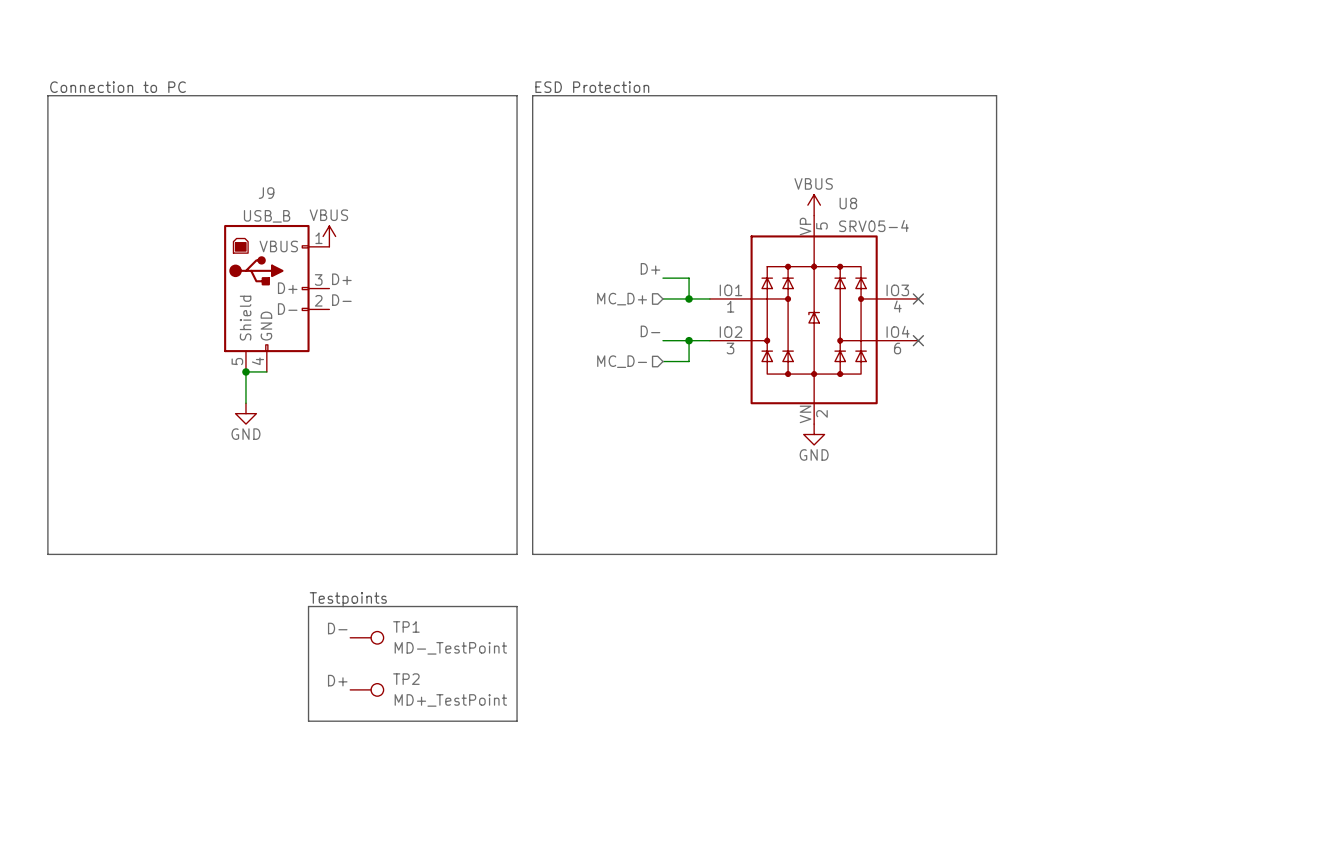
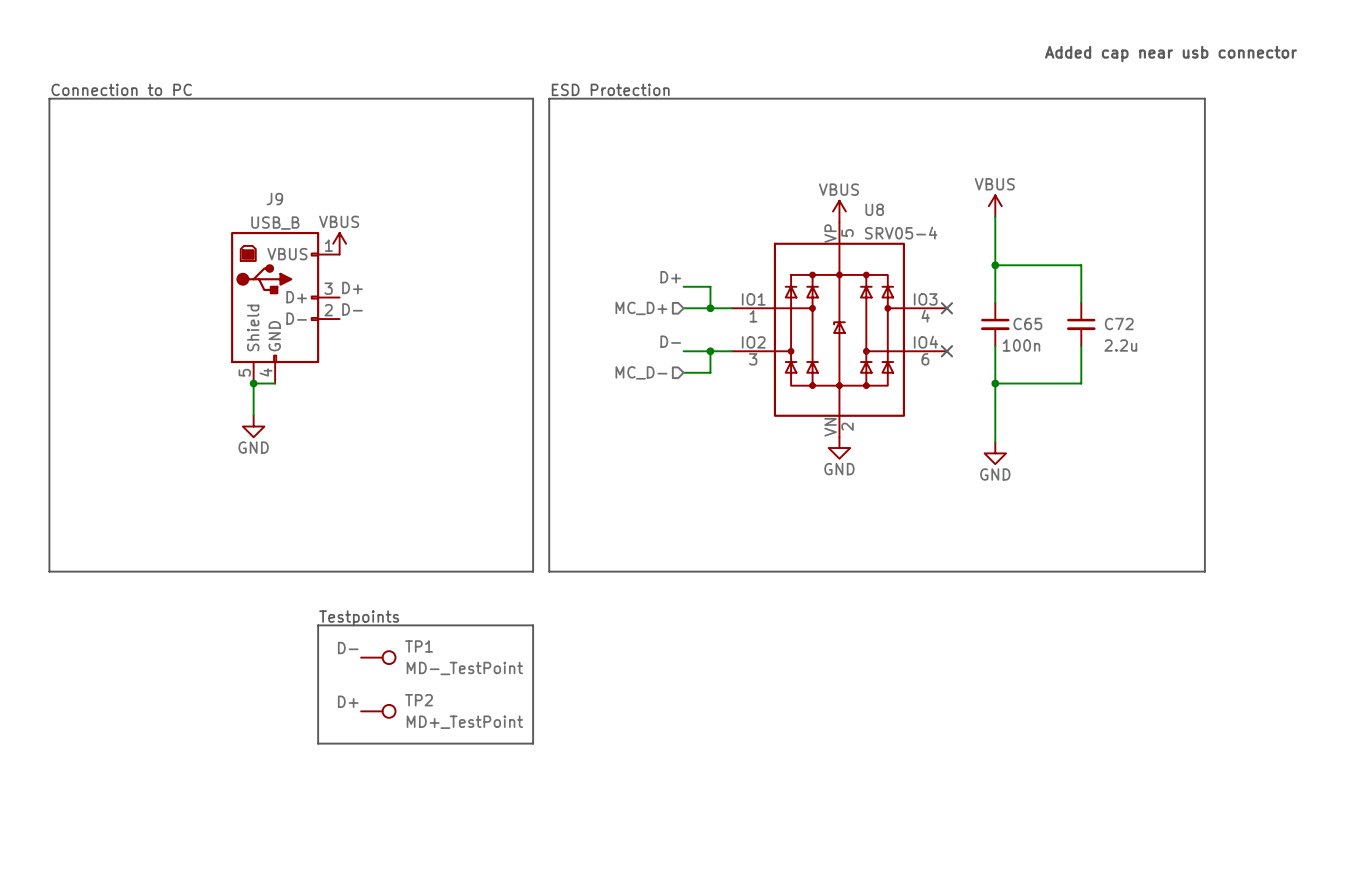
text: none -> Added cap near usb connector (1171, 54)
line: (996, 95) (996, 554) -> (1027, 98) (1204, 98) (1204, 571) (1027, 571)
power symbol: none -> VBUS (995, 206)
wire: none -> (995, 216) (995, 302)
wire: none -> (995, 265) (1081, 265) (1081, 302)
junction: none -> (995, 265)
C65: none -> 100n (995, 324)
C72: none -> 2.2u (1081, 324)
wire: none -> (995, 345) (995, 442)
wire: none -> (1081, 345) (1081, 383) (995, 383)
junction: none -> (995, 383)
power symbol: none -> GND (995, 453)

